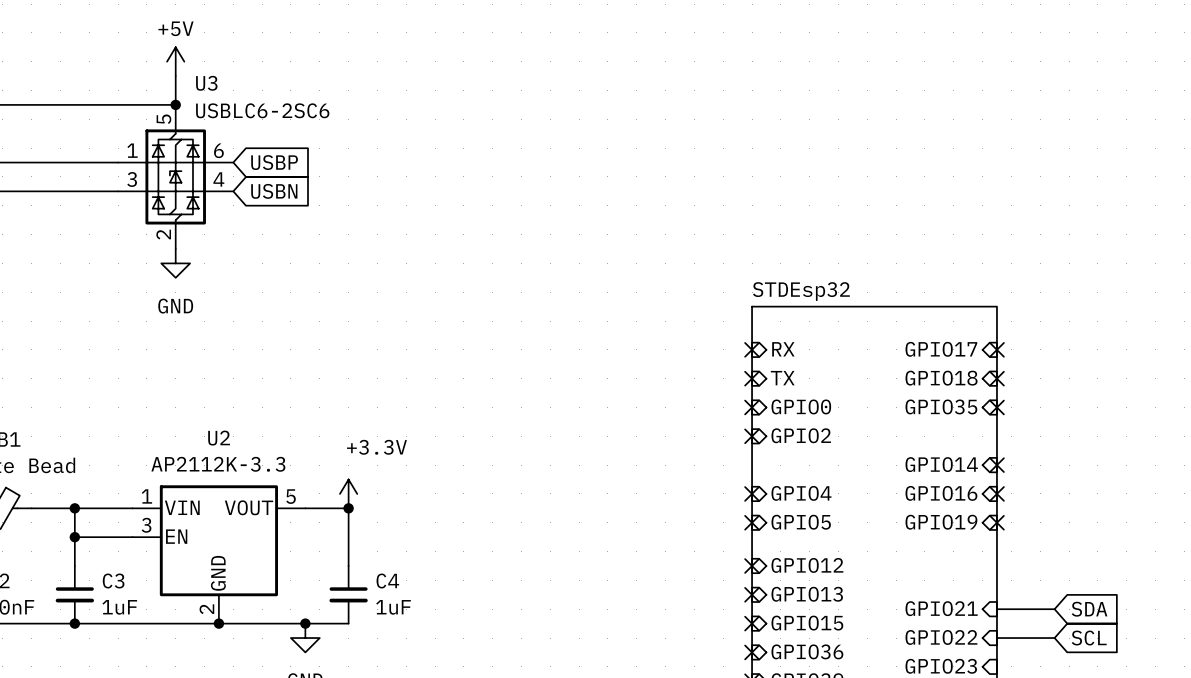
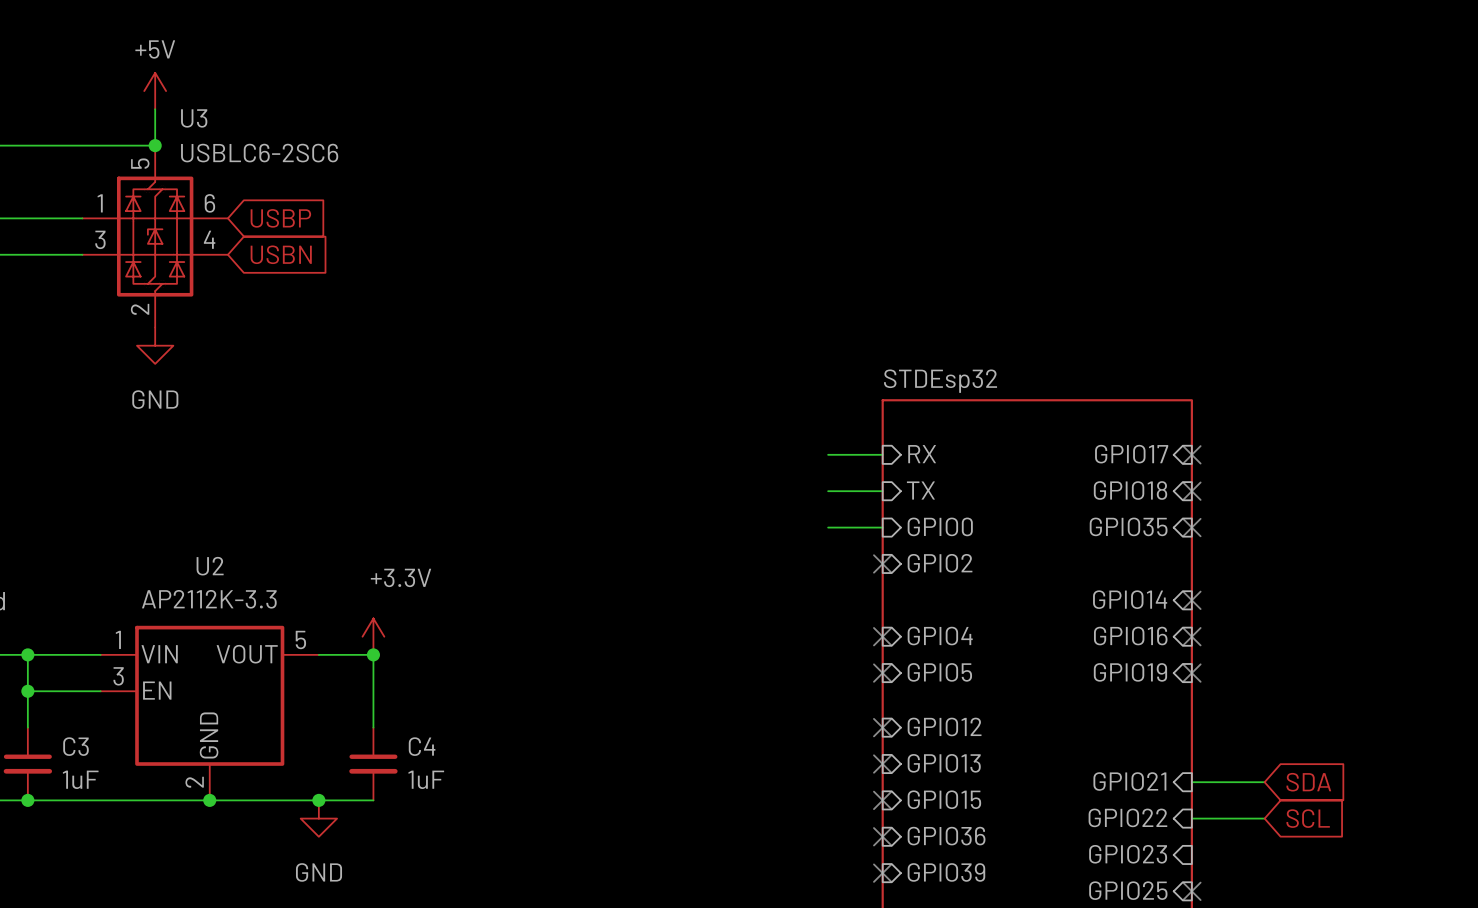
wire: none -> (828, 454) (882, 454)
no-connect mark: (752, 349) -> none
wire: none -> (828, 491) (882, 491)
no-connect mark: (752, 378) -> none
wire: none -> (828, 527) (882, 527)
no-connect mark: (752, 407) -> none

